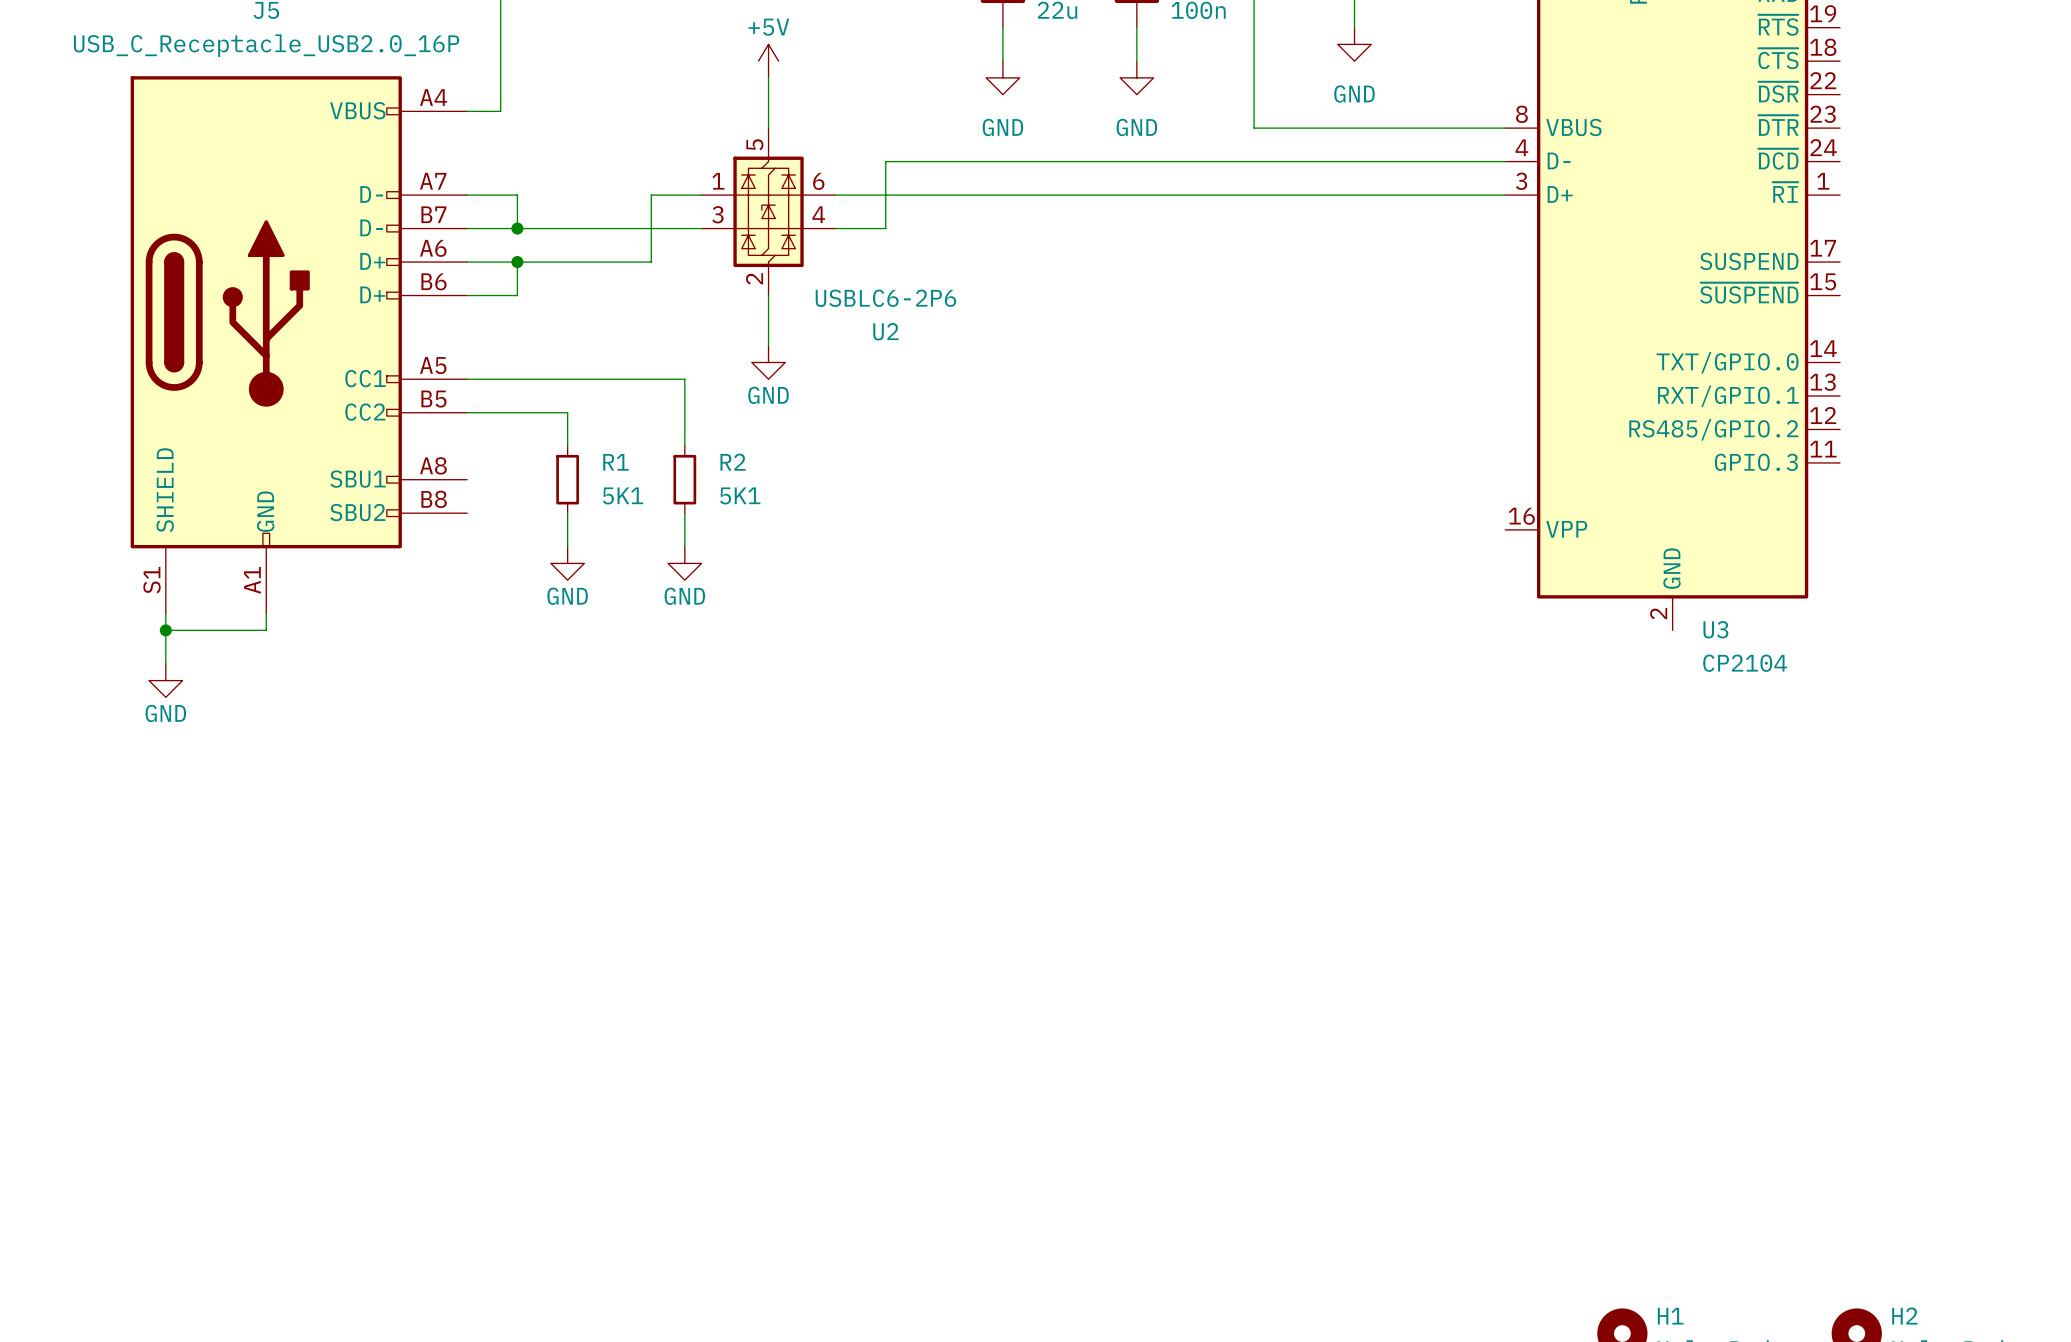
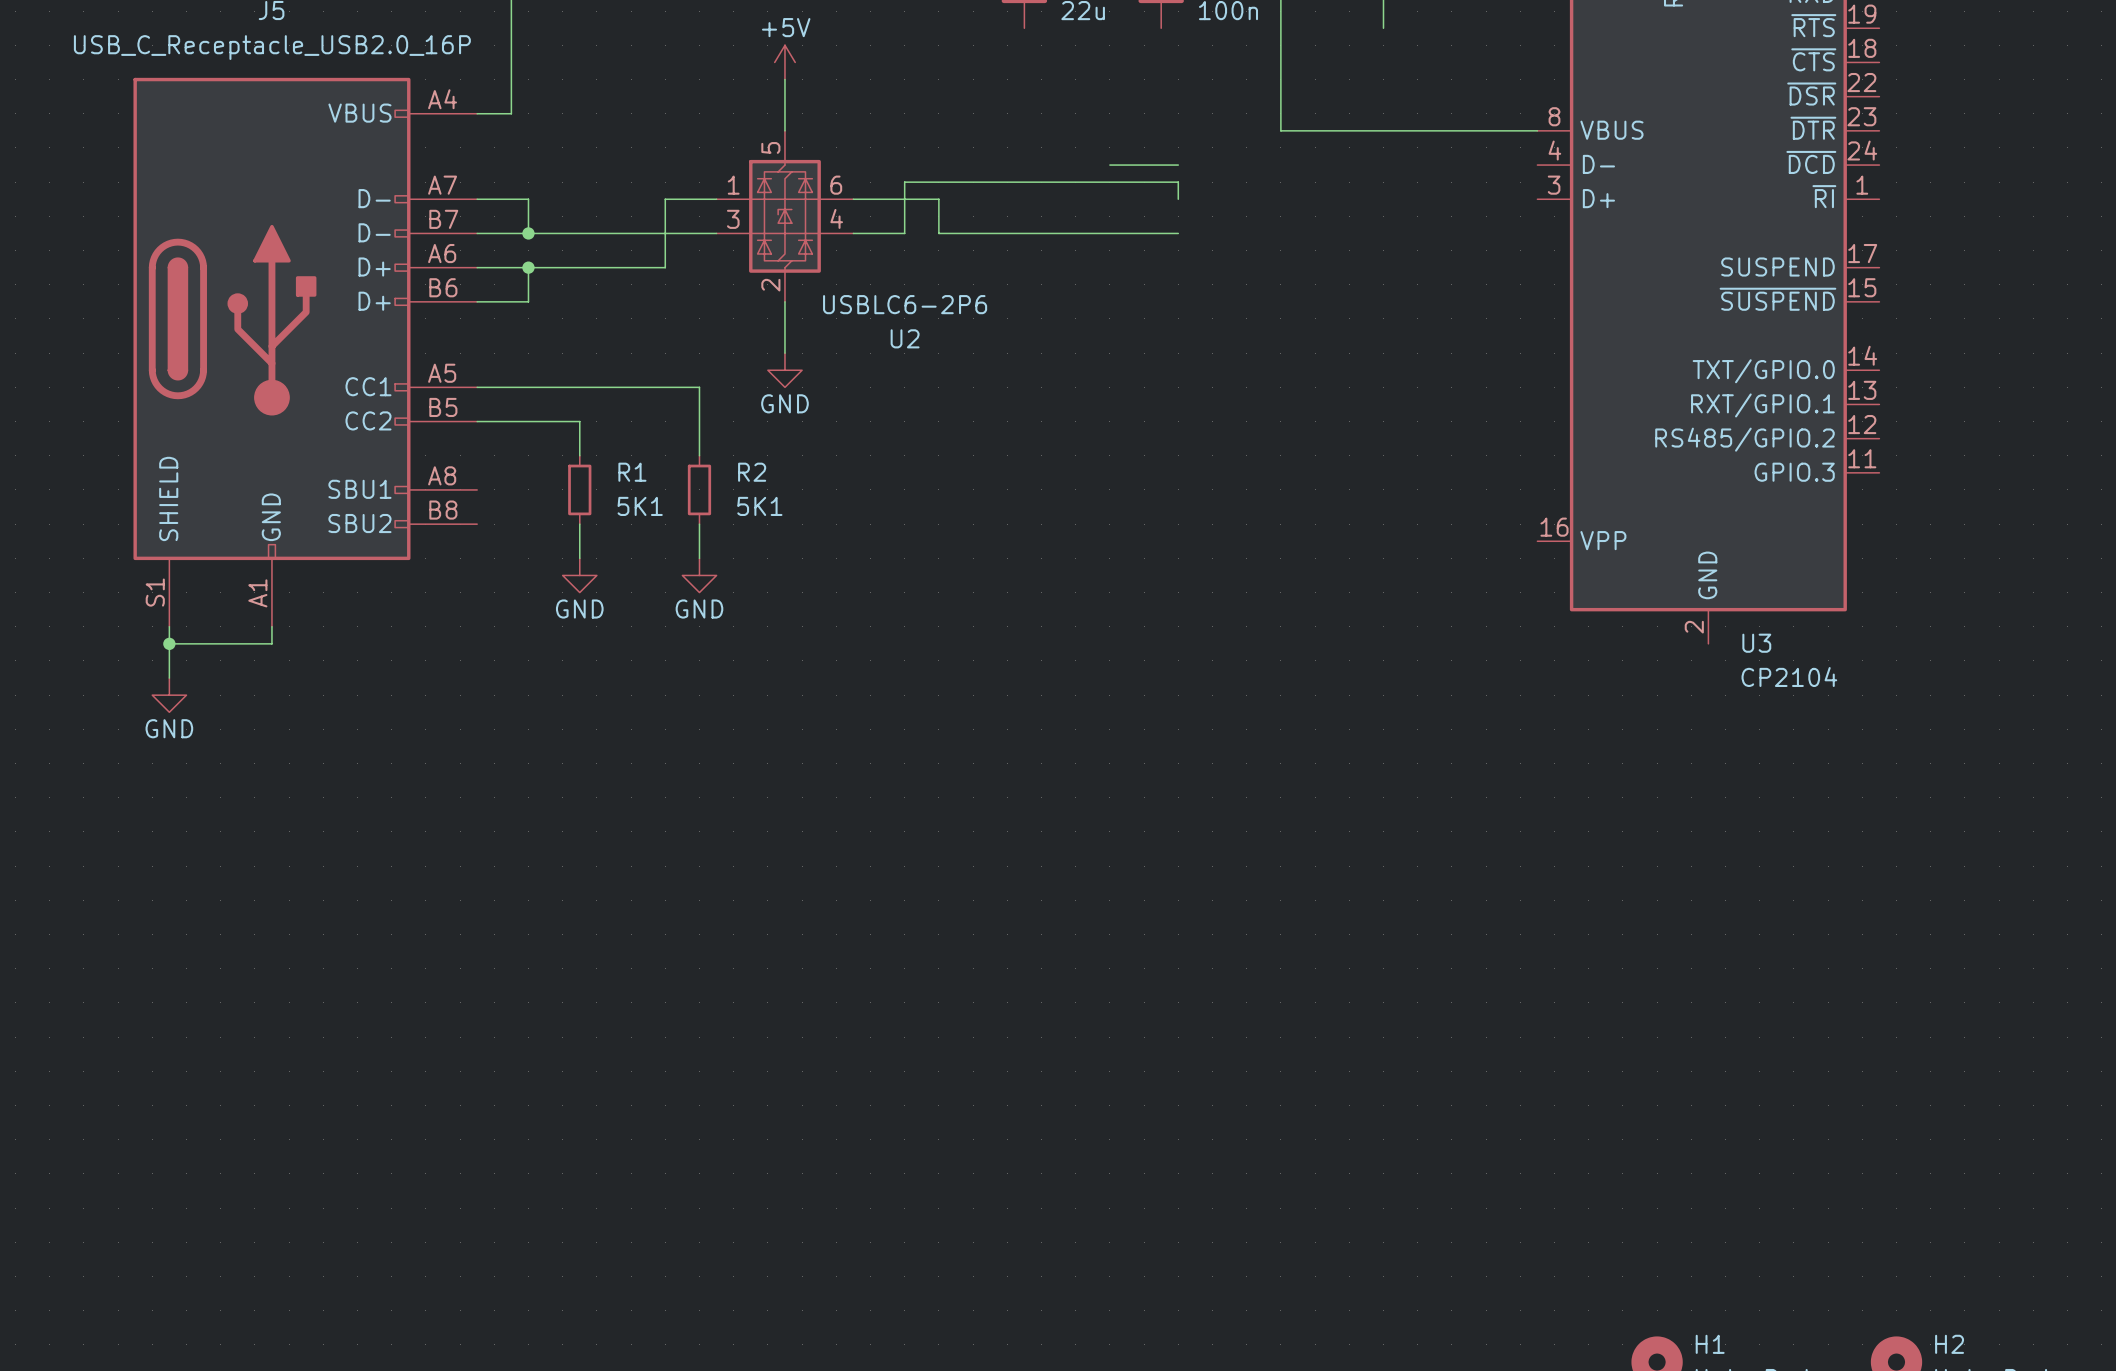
wire: (1002, 27) (1002, 61) -> none
wire: (1136, 27) (1136, 61) -> none
power symbol: GND (1354, 44) -> none
power symbol: GND (1002, 77) -> none
power symbol: GND (1136, 77) -> none
wire: (1086, 161) (885, 161) (885, 178) -> (1178, 199) (1178, 182) (904, 182)
wire: (1153, 161) (1505, 161) -> none
wire: (919, 195) (1505, 195) -> (938, 199) (938, 233) (1178, 233)

